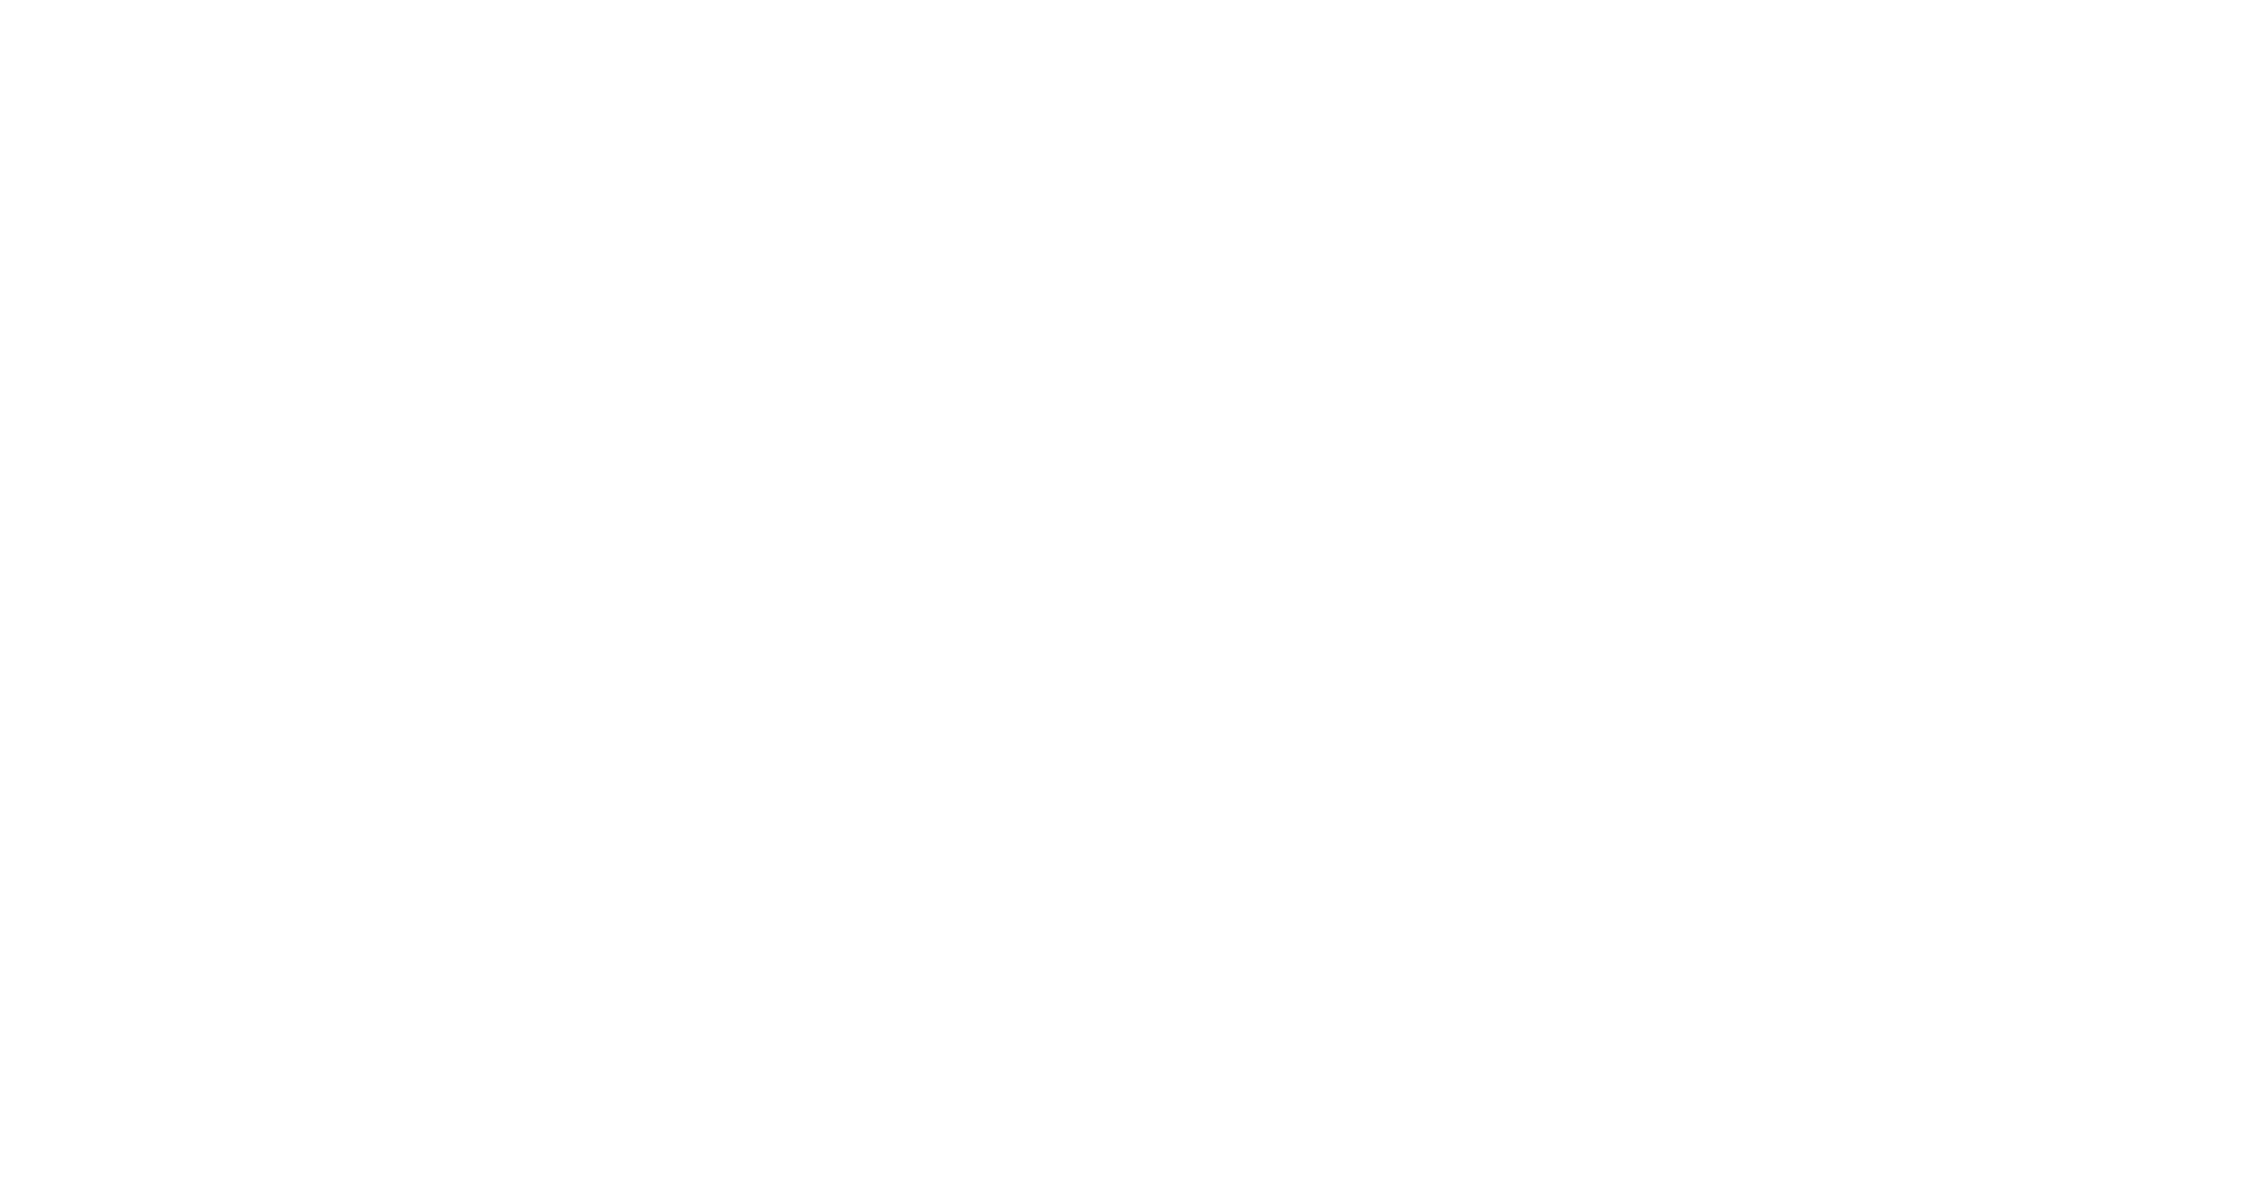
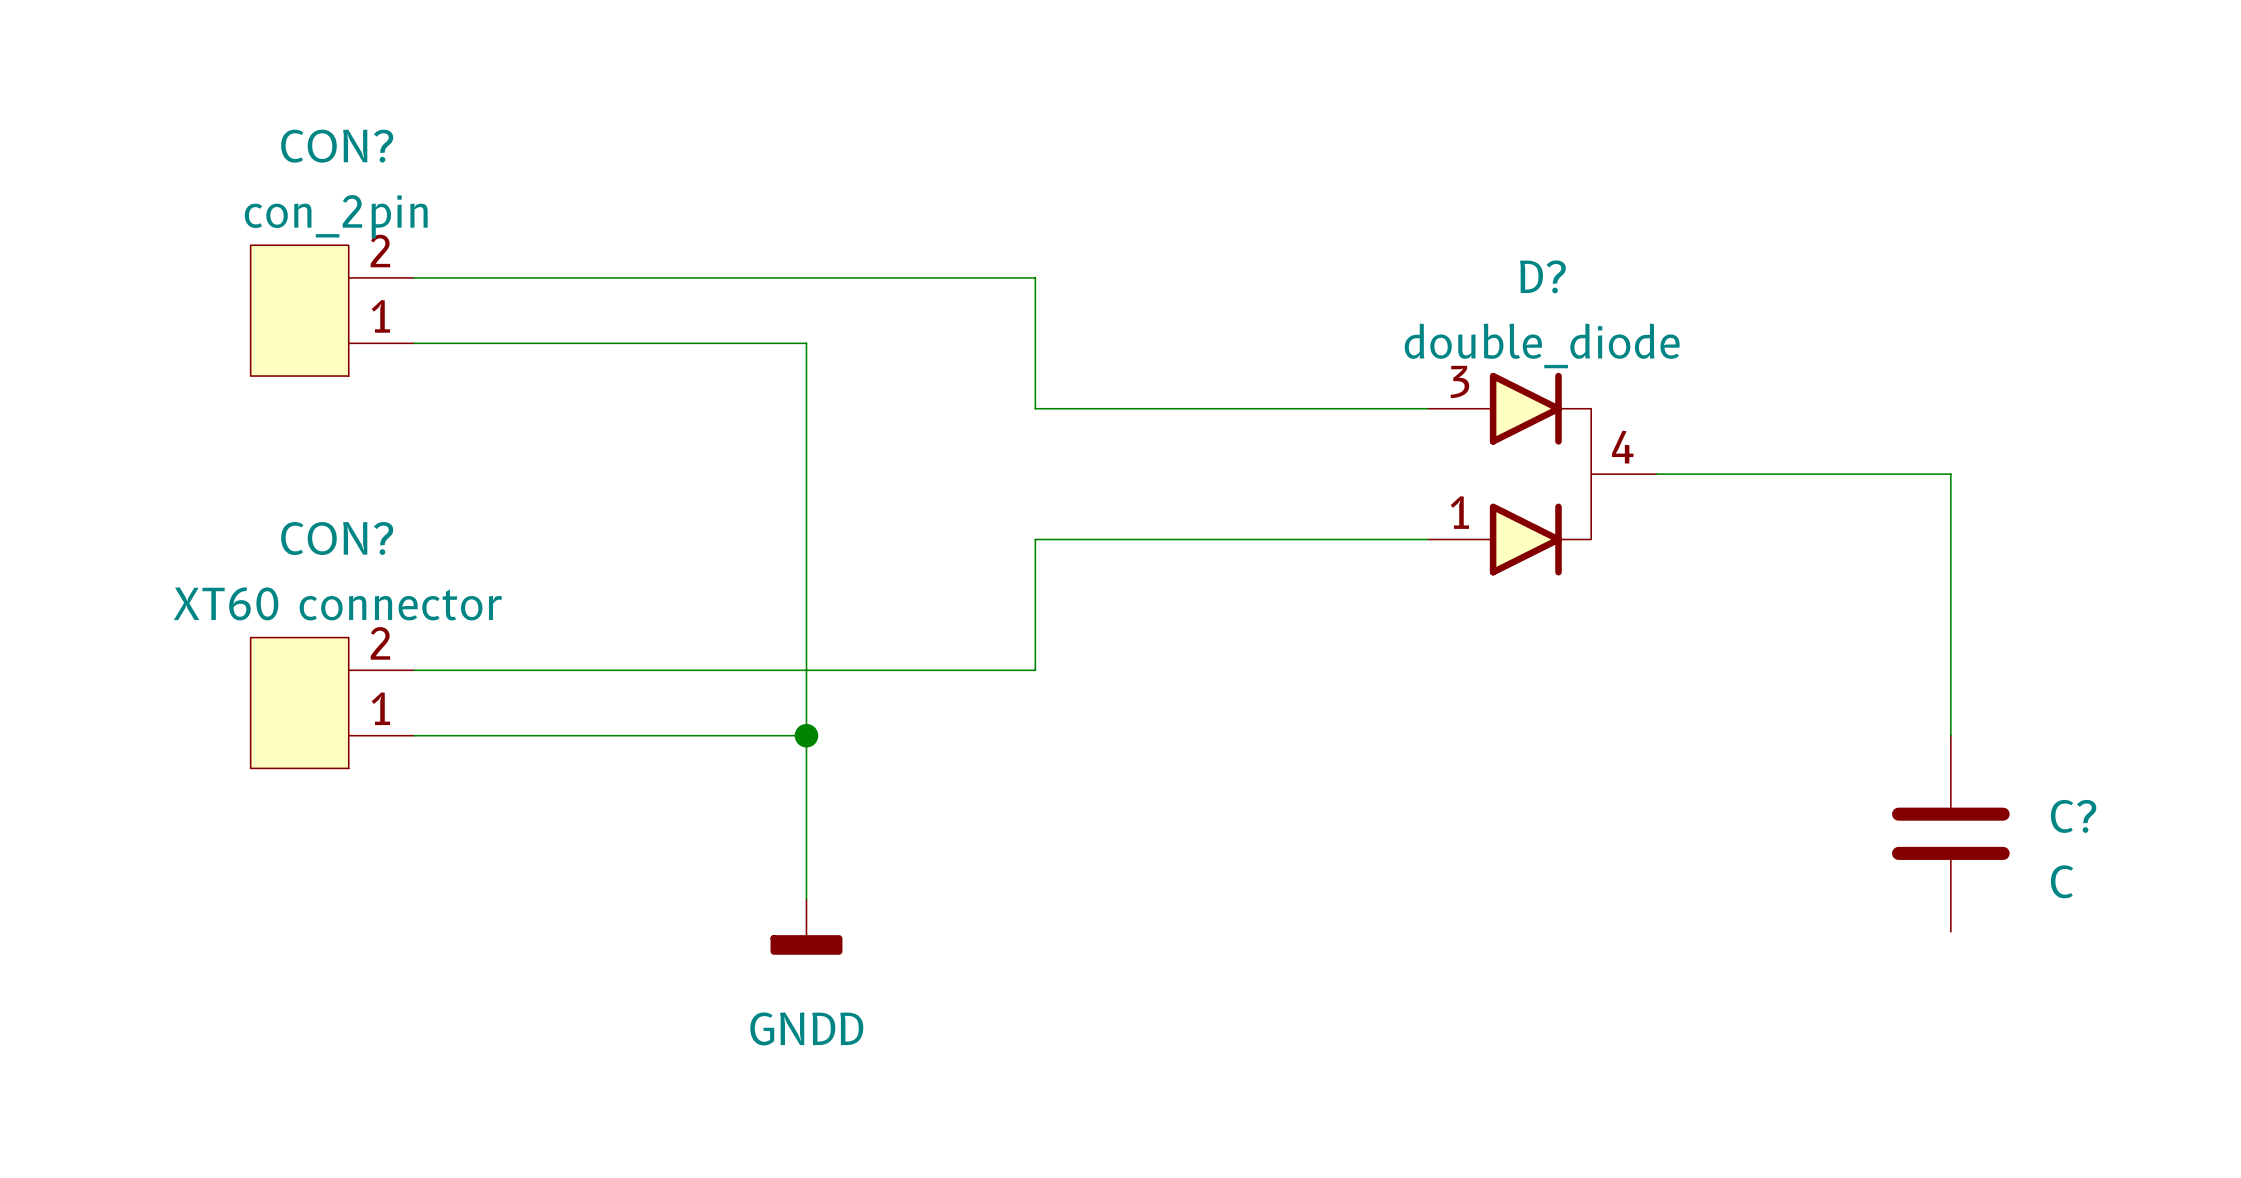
wire: none -> (414, 277) (1035, 277) (1035, 408) (1427, 408)
CON?: none -> con_2pin (332, 310)
wire: none -> (414, 343) (806, 343) (806, 899)
D?: none -> double_diode (1542, 474)
wire: none -> (1656, 474) (1950, 474) (1950, 735)
wire: none -> (1427, 539) (1035, 539) (1035, 670) (414, 670)
CON?: none -> XT60 connector (332, 702)
wire: none -> (414, 735) (806, 735)
junction: none -> (806, 735)
C?: none -> C (1950, 833)
power symbol: none -> GNDD (806, 926)

